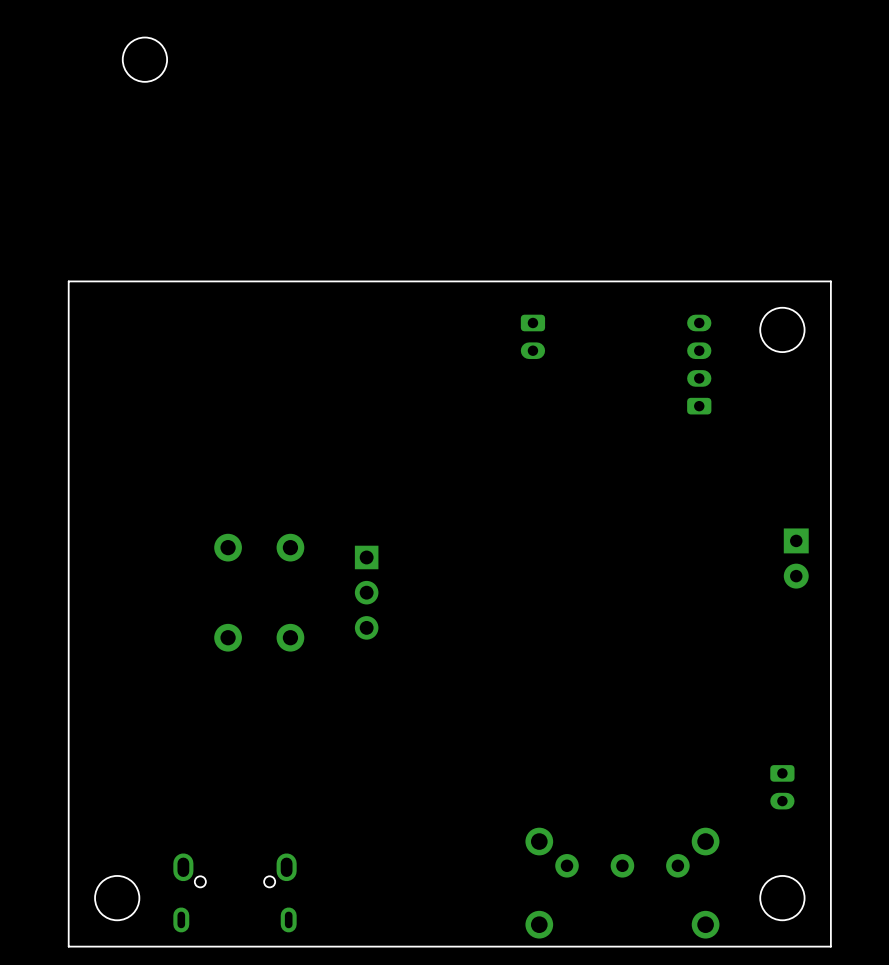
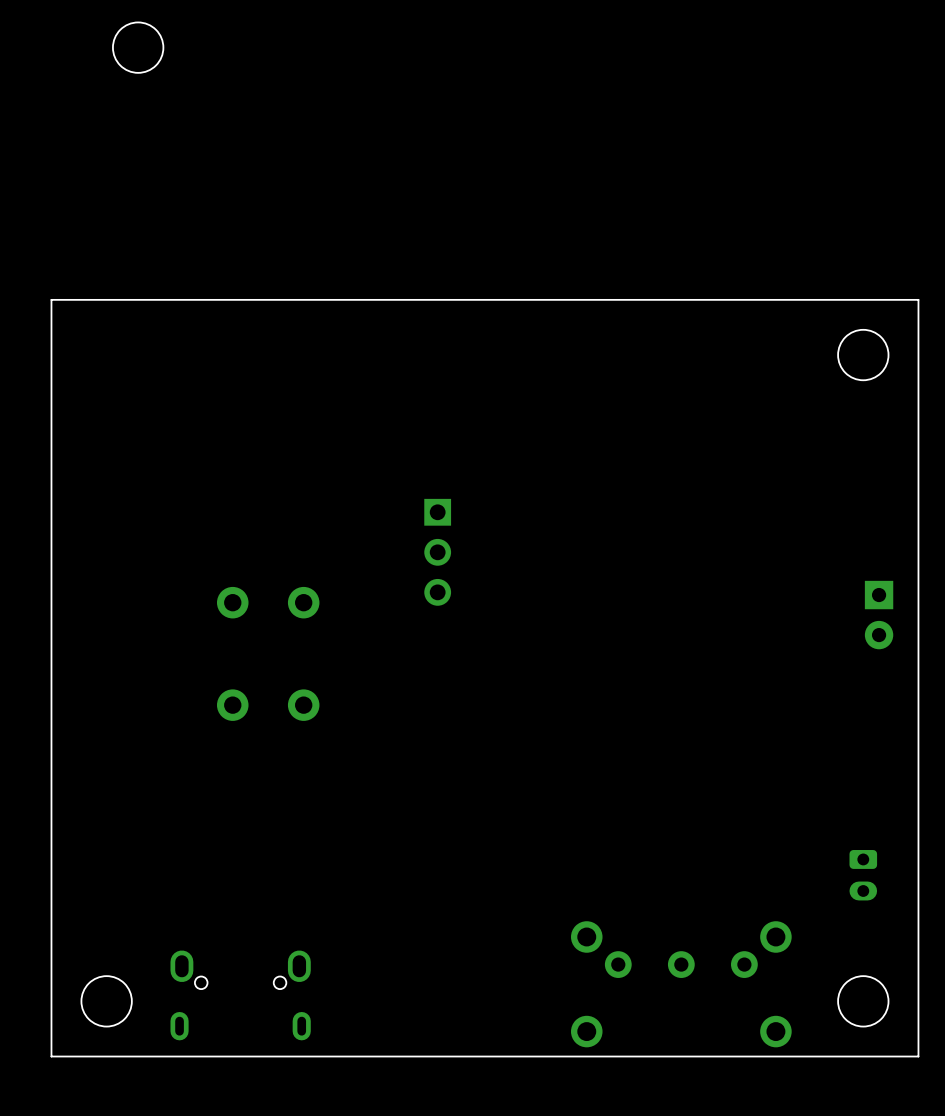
part: (532, 336) -> none
part: (699, 364) -> none
part position: (366, 592) -> (437, 552)

